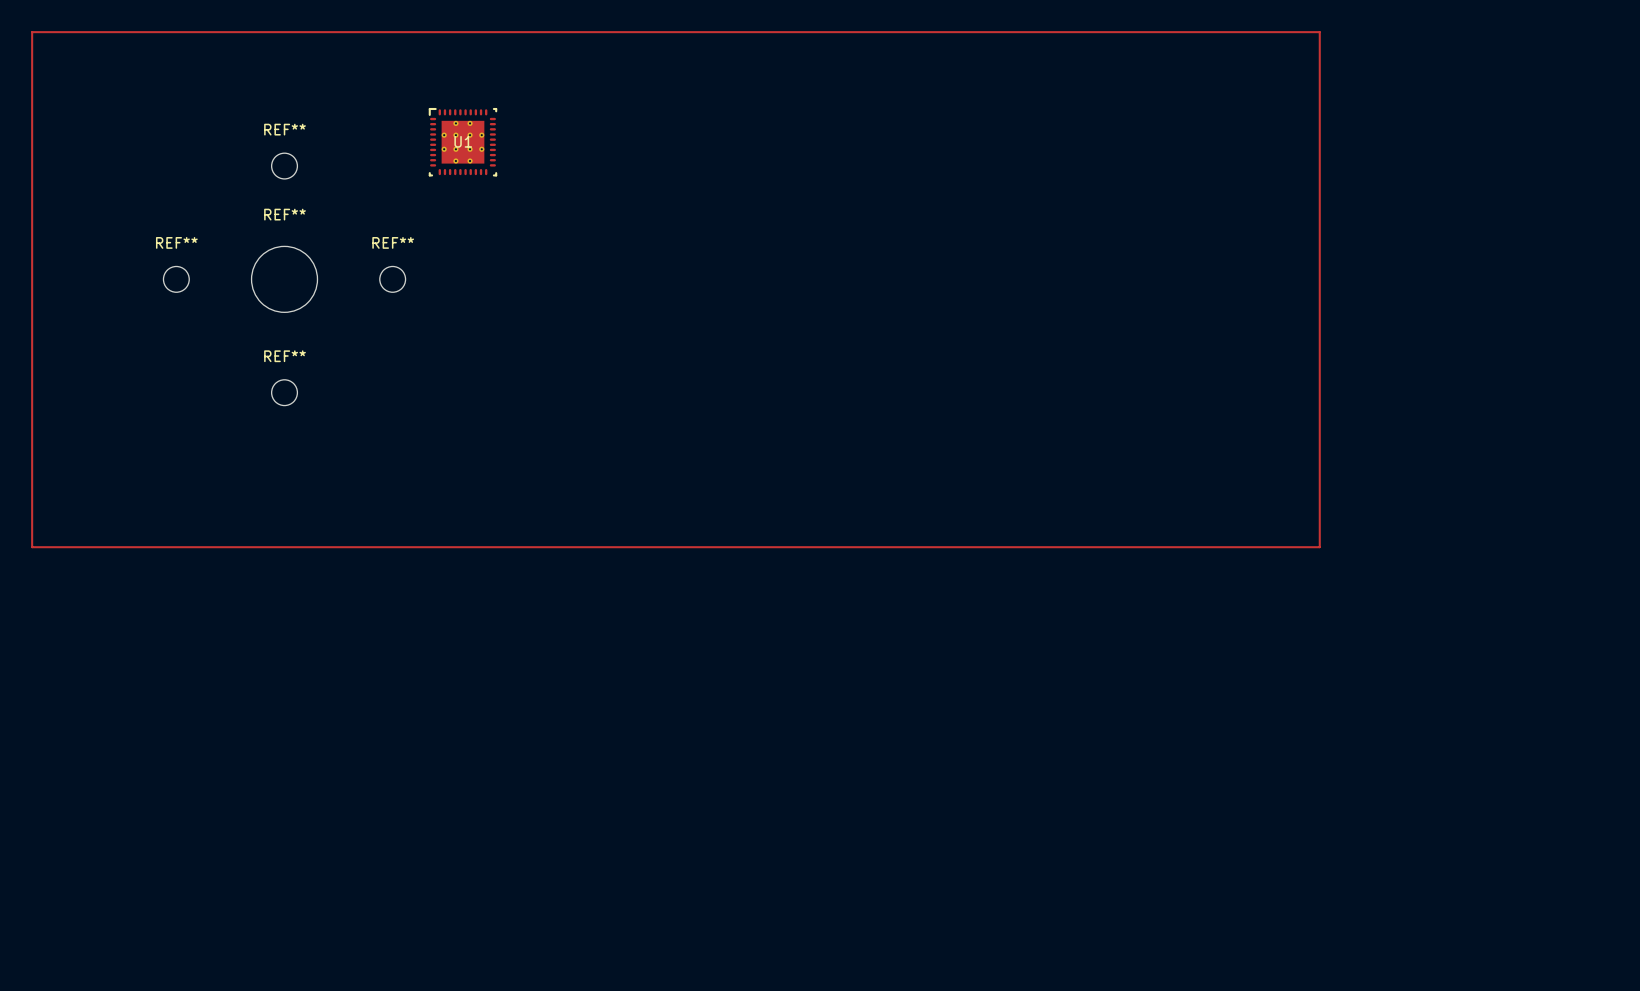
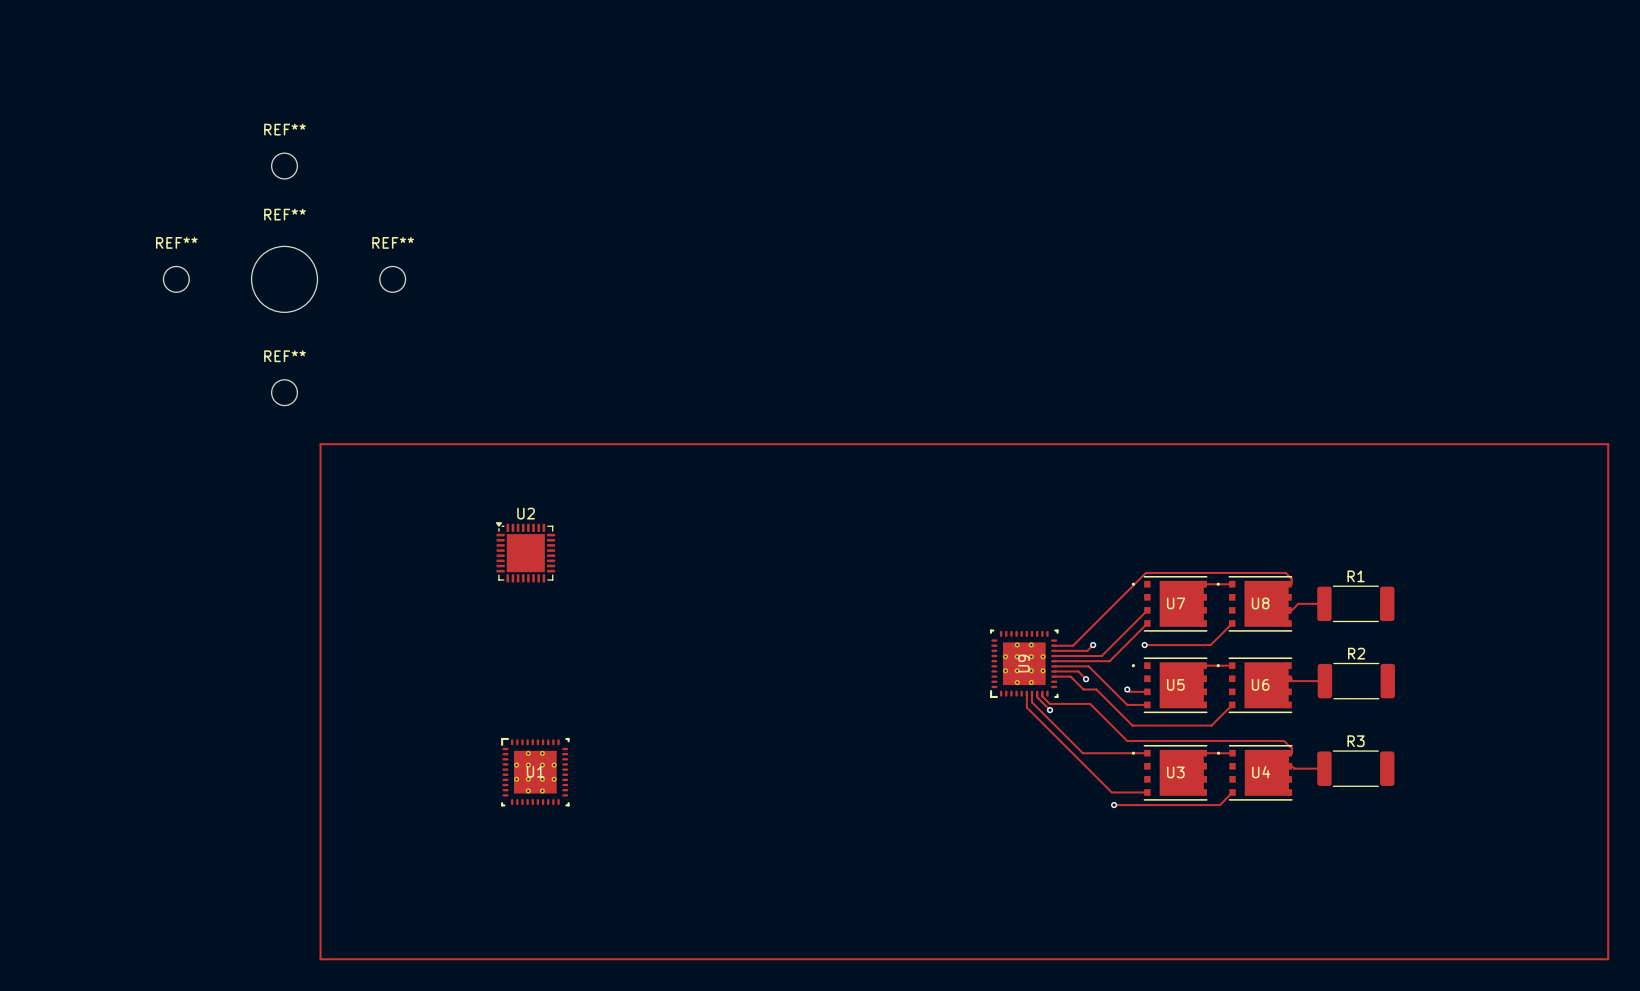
track: (32, 32) (1319, 32) (1319, 547) (32, 547) (32, 32) -> none
U1 position: (462, 142) -> (535, 772)
track: none -> (320, 444) (1608, 444) (1608, 959) (320, 959) (320, 444)
U2: none -> (525, 552)
track: none -> (1206, 584) (1232, 584)
track: none -> (1291, 584) (1291, 578) (1285, 572) (1145, 572) (1073, 645) (1054, 645)
U7: none -> (1169, 603)
U8: none -> (1254, 603)
track: none -> (1324, 603) (1298, 603) (1291, 610)
R1: none -> (1355, 603)
track: none -> (1147, 610) (1101, 656) (1054, 656)
track: none -> (1147, 623) (1109, 661) (1054, 661)
track: none -> (1232, 623) (1210, 645) (1144, 645)
track: none -> (1093, 645) (1087, 650) (1054, 650)
via: none -> (1093, 645)
via: none -> (1144, 645)
U9: none -> (1024, 663)
track: none -> (1206, 665) (1232, 665)
track: none -> (1054, 666) (1088, 666) (1127, 704) (1147, 704)
track: none -> (1054, 671) (1078, 671) (1086, 679)
track: none -> (1054, 676) (1070, 676) (1083, 689) (1096, 689) (1132, 725) (1211, 725) (1232, 704)
track: none -> (1291, 678) (1291, 681) (1324, 681)
via: none -> (1086, 679)
R2: none -> (1356, 681)
U5: none -> (1169, 685)
U6: none -> (1254, 685)
track: none -> (1127, 689) (1129, 691) (1147, 691)
via: none -> (1127, 689)
track: none -> (1026, 693) (1026, 707) (1111, 792) (1147, 792)
track: none -> (1032, 693) (1032, 702) (1082, 753) (1147, 753)
track: none -> (1037, 693) (1037, 697) (1050, 710)
track: none -> (1042, 693) (1042, 696) (1049, 703) (1090, 703) (1127, 741) (1284, 741) (1292, 748) (1292, 753)
via: none -> (1050, 710)
track: none -> (1206, 753) (1232, 753)
track: none -> (1292, 766) (1294, 768) (1324, 768)
R3: none -> (1355, 768)
U3: none -> (1169, 772)
U4: none -> (1254, 772)
track: none -> (1232, 793) (1219, 805) (1114, 805)
via: none -> (1114, 805)

